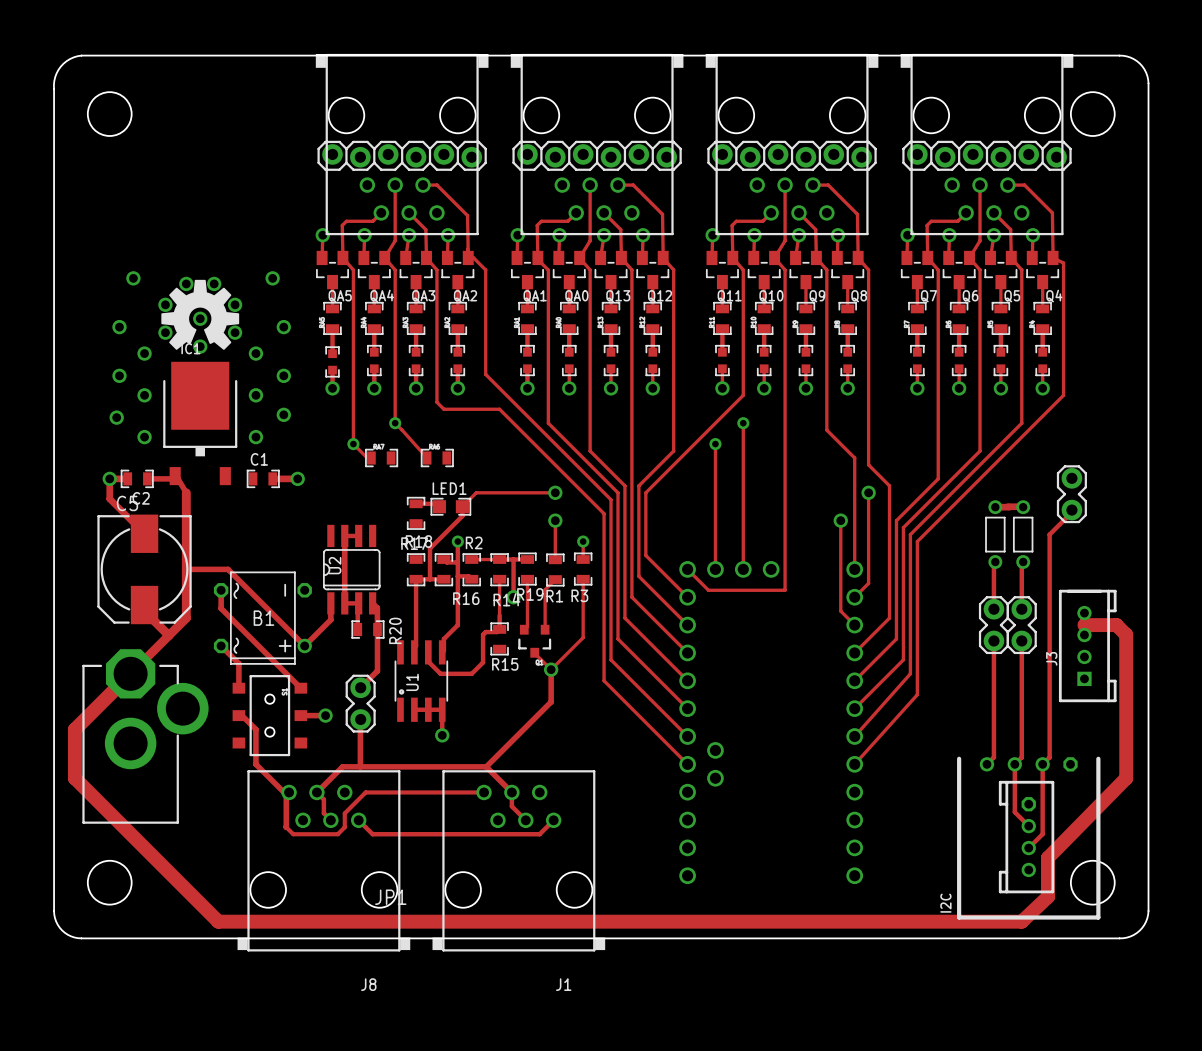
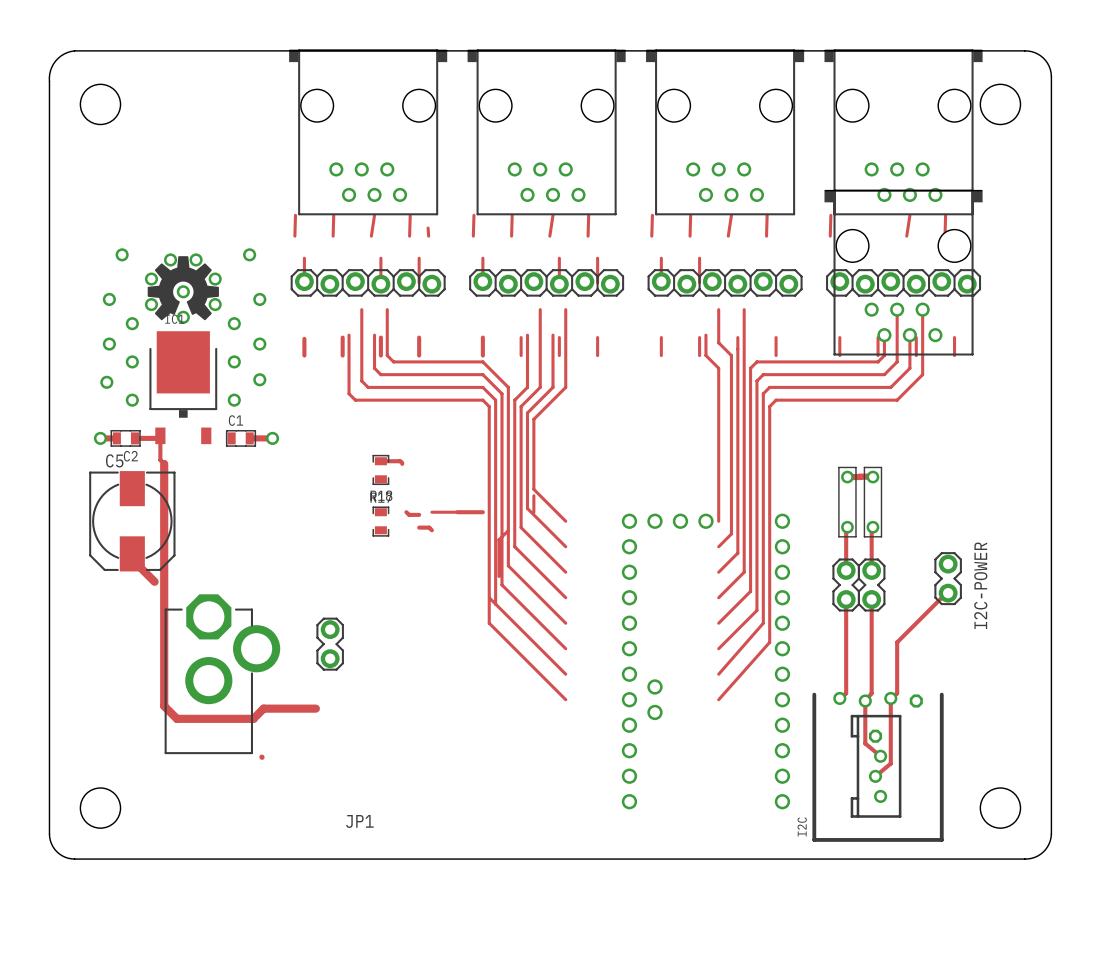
part: (402, 155) -> none
part: (597, 155) -> none
part: (792, 155) -> none
part: (986, 155) -> none
track: (395, 185) (395, 240) (384, 257) (395, 270) (395, 338) -> none
track: (423, 185) (436, 185) (467, 215) (468, 257) (473, 257) (485, 270) (485, 374) (611, 499) (611, 659) (687, 736) -> none
track: (590, 185) (590, 240) (579, 257) (590, 270) (590, 338) -> none
track: (617, 185) (633, 185) (662, 214) (663, 257) (673, 270) (673, 451) (638, 485) (638, 576) (687, 625) -> none
track: (785, 185) (785, 240) (774, 257) (785, 270) (785, 338) -> none
track: (812, 185) (828, 185) (857, 214) (858, 257) (868, 270) (868, 464) (889, 485) (889, 618) (854, 652) -> none
track: (980, 185) (980, 240) (969, 257) (980, 270) (980, 338) -> none
track: (1007, 185) (1024, 185) (1052, 212) (1053, 257) (1063, 263) (1063, 395) (917, 541) (917, 694) (854, 764) -> none
track: (381, 212) (372, 221) (346, 221) (342, 225) (342, 257) (353, 270) (353, 444) (367, 458) (371, 458) -> none
track: (409, 212) (425, 229) (426, 257) (436, 270) (436, 402) (443, 409) -> (374, 335) (374, 368) (380, 374) (406, 374)
track: (576, 212) (567, 221) (541, 221) (537, 225) (537, 257) (548, 270) (548, 423) (617, 492) (617, 639) (687, 708) -> none
track: (604, 212) (620, 229) (621, 257) (631, 270) (631, 597) (687, 652) -> none
track: (771, 212) (762, 221) (736, 221) (732, 225) (732, 257) (743, 270) (743, 395) (645, 492) (645, 555) (687, 597) -> none
track: (799, 212) (815, 229) (816, 257) (826, 270) (826, 416) -> (897, 361) (884, 374) (763, 374) (756, 381)
track: (966, 212) (957, 221) (931, 221) (927, 225) (927, 257) (938, 270) (938, 478) (896, 520) (896, 639) (854, 680) -> none
track: (993, 212) (1010, 229) (1011, 257) (1021, 270) (1021, 423) (910, 534) (910, 673) (854, 736) -> none
via: (322, 235) -> none
via: (364, 235) -> none
via: (409, 235) -> none
via: (448, 235) -> none
via: (517, 235) -> none
via: (559, 235) -> none
via: (604, 235) -> none
via: (643, 235) -> none
via: (712, 235) -> none
via: (754, 235) -> none
via: (799, 235) -> none
via: (837, 235) -> none
via: (907, 235) -> none
track: (949, 235) (948, 257) -> none
via: (949, 235) -> none
via: (993, 235) -> none
via: (1032, 235) -> none
QA5: (332, 270) -> none
QA4: (374, 270) -> none
QA3: (416, 270) -> none
QA2: (457, 270) -> none
QA1: (527, 270) -> none
QA0: (569, 270) -> none
Q13: (611, 270) -> none
Q12: (652, 270) -> none
Q11: (722, 270) -> none
Q10: (764, 270) -> none
Q9: (805, 270) -> none
Q8: (847, 270) -> none
Q7: (917, 270) -> none
Q6: (959, 270) -> none
Q5: (1000, 270) -> none
Q4: (1042, 270) -> none
track: (374, 282) (374, 308) -> none
track: (569, 282) (569, 308) -> none
track: (805, 282) (805, 308) -> none
track: (847, 282) (847, 308) -> none
track: (917, 282) (917, 308) -> none
track: (959, 282) (959, 308) -> none
track: (1000, 282) (1000, 308) -> none
track: (1042, 282) (1042, 308) -> none
part: none -> (903, 272)
part: none -> (368, 282)
part: none -> (546, 282)
part: none -> (725, 282)
part: none -> (903, 282)
part: (332, 318) -> none
part: (374, 318) -> none
part: (416, 318) -> none
part: (457, 318) -> none
part: (527, 318) -> none
part: (569, 318) -> none
part: (611, 318) -> none
part: (652, 318) -> none
part: (722, 318) -> none
part: (764, 318) -> none
part: (805, 318) -> none
part: (847, 318) -> none
part: (917, 318) -> none
part: (959, 318) -> none
part: (1000, 318) -> none
part: (1042, 318) -> none
track: (332, 328) (332, 353) -> none
track: (374, 328) (374, 352) -> none
track: (416, 328) (416, 352) -> none
track: (457, 328) (457, 352) -> none
track: (527, 328) (527, 352) -> none
track: (569, 328) (569, 352) -> none
track: (611, 328) (611, 352) -> none
track: (652, 328) (652, 352) -> none
track: (722, 328) (722, 352) -> none
track: (764, 328) (764, 352) -> none
track: (805, 328) (805, 352) -> none
track: (847, 328) (847, 352) -> none
track: (917, 328) (917, 352) -> none
track: (959, 328) (959, 352) -> none
track: (1000, 328) (1000, 352) -> none
track: (1042, 328) (1042, 352) -> none
track: none -> (387, 309) (387, 355) (393, 361) (482, 361) (508, 387) (508, 476)
track: none -> (565, 309) (565, 387) (533, 419) (533, 489) (565, 521)
track: none -> (744, 309) (744, 572) (718, 597)
track: none -> (922, 309) (922, 374) (897, 400) (776, 400) (769, 406) (769, 476)
part: (374, 360) -> none
part: (416, 360) -> none
part: (457, 360) -> none
part: (527, 360) -> none
part: (569, 360) -> none
part: (611, 360) -> none
part: (652, 360) -> none
part: (722, 360) -> none
part: (764, 360) -> none
part: (805, 360) -> none
part: (847, 360) -> none
part: (917, 360) -> none
part: (959, 360) -> none
part: (1000, 360) -> none
part: (1042, 360) -> none
part: (332, 361) -> none
track: none -> (527, 335) (527, 387) (514, 400) (514, 546) (565, 597)
track: none -> (552, 335) (552, 387) (527, 412) (527, 508) (565, 546)
track: none -> (884, 335) (884, 355) (878, 361) (756, 361) (750, 368) (750, 591) (718, 623)
track: none -> (909, 335) (909, 368) (890, 387) (769, 387) (763, 393) (763, 623) (718, 674)
track: (785, 374) (785, 402) -> (705, 335) (705, 355) (718, 368)
track: none -> (718, 342) (731, 355) (731, 534) (718, 546)
via: (332, 388) -> none
via: (374, 388) -> none
via: (416, 388) -> none
via: (457, 388) -> none
via: (527, 388) -> none
via: (569, 388) -> none
via: (611, 388) -> none
via: (652, 388) -> none
via: (722, 388) -> none
via: (764, 388) -> none
track: none -> (737, 355) (737, 553) (718, 572)
via: (805, 388) -> none
via: (847, 388) -> none
via: (917, 388) -> none
via: (959, 388) -> none
via: (1000, 388) -> none
via: (1042, 388) -> none
track: (980, 395) (980, 451) (903, 527) (903, 659) (854, 708) -> none
track: (499, 409) (527, 437) -> (349, 335) (349, 393) (355, 400) (482, 400)
track: none -> (457, 374) (482, 374) (502, 393) (502, 584) (565, 648)
track: (395, 416) (395, 423) (427, 458) -> (361, 381) (368, 387) (482, 387) (495, 400) (495, 604)
via: (395, 423) -> none
track: (590, 423) (590, 451) (624, 485) (624, 618) (687, 680) -> (540, 387) (521, 406) (521, 527) (565, 572)
track: (743, 423) (743, 569) -> none
via: (743, 423) -> none
track: (826, 430) (854, 458) (854, 569) -> (756, 393) (756, 610) (718, 648)
via: (353, 444) -> none
track: (534, 444) (604, 513) (604, 680) (687, 764) -> (489, 406) (489, 623) (565, 699)
track: (715, 444) (715, 569) -> none
via: (715, 444) -> none
part: (381, 458) -> none
part: (437, 458) -> none
C2 footprint: [120, 469, 154, 489] -> [110, 429, 141, 447]
C1 footprint: [246, 469, 280, 489] -> [225, 429, 257, 447]
track: (175, 476) (186, 492) (186, 618) (74, 729) (74, 778) (218, 921) (1021, 921) (1047, 896) (1047, 857) (1126, 778) (1126, 634) (1116, 625) (1084, 625) -> (160, 435) (160, 460) (164, 463) (164, 706) (176, 718) (253, 718) (263, 708) (315, 708)
track: (109, 478) (109, 498) (144, 533) -> none
track: (555, 492) (476, 492) (462, 506) (462, 516) (430, 548) (430, 579) -> none
via: (555, 492) -> none
track: (868, 492) (868, 583) (854, 597) -> none
via: (868, 492) -> none
part: (1071, 494) -> none
LED1: (450, 506) -> none
track: (1007, 506) (1023, 506) (995, 507) -> (858, 476) (873, 476) (847, 477)
track: (1071, 510) (1049, 534) (1049, 757) (1042, 764) (1042, 834) (1028, 848) -> none
via: (555, 520) -> none
via: (840, 520) -> none
part: (995, 534) -> none
part: (1023, 534) -> none
track: (358, 535) (344, 535) (344, 603) (358, 603) (357, 629) -> none
track: (457, 541) (457, 625) (443, 639) (442, 652) -> none
via: (457, 541) -> none
via: (583, 541) -> none
part: none -> (847, 502)
part: none -> (872, 502)
track: (513, 559) (513, 597) -> none
track: none -> (508, 512) (508, 565) (565, 623)
track: (995, 561) (993, 609) -> (847, 527) (846, 570)
track: (1023, 561) (1021, 609) -> (872, 527) (871, 570)
track: (186, 569) (228, 569) (304, 645) (330, 619) (330, 603) -> none
U2: (351, 569) -> none
R16: (443, 569) -> none
R2: (471, 569) -> none
R14: (499, 569) -> none
R19: (527, 569) -> none
R3: (583, 569) -> none
track: (687, 569) (708, 590) (785, 590) (785, 569) -> none
R1: (555, 570) -> none
track: (443, 579) (416, 579) (416, 645) (414, 653) -> none
track: (499, 579) (499, 629) (497, 632) (485, 632) (483, 634) (483, 662) (471, 673) (440, 673) (428, 661) (428, 652) -> none
track: (527, 579) (527, 626) (524, 629) -> none
track: (583, 579) (583, 637) (551, 669) (551, 701) (486, 766) -> none
track: (221, 590) (221, 608) (300, 688) -> none
via: (513, 597) -> none
track: (372, 603) (377, 608) (377, 670) (360, 687) -> none
track: (840, 611) (854, 625) -> (769, 559) (769, 642) (718, 699)
B1: (262, 618) -> none
part: (993, 625) -> none
part: (1021, 625) -> none
R20: (367, 629) -> none
I2C-POWER: none -> (948, 578)
R15: (499, 638) -> none
part: none -> (846, 584)
part: none -> (871, 584)
track: (993, 640) (993, 757) (986, 764) -> none
track: (1021, 640) (1021, 757) (1014, 764) (1014, 812) (1028, 826) -> none
part: (534, 641) -> none
track: (221, 645) (238, 663) (238, 688) -> none
J3: (1087, 645) -> none
track: none -> (948, 593) (897, 642) (897, 693) (890, 698) (890, 763) (875, 776)
track: none -> (846, 599) (846, 693) (839, 698)
track: none -> (871, 599) (871, 693) (865, 700) (865, 743) (880, 756)
track: none -> (504, 613) (565, 674)
via: (551, 669) -> none
U1: (421, 681) -> none
track: (414, 709) (442, 709) (442, 735) -> none
track: (238, 715) (242, 715) (255, 729) (255, 764) (284, 792) (289, 792) (286, 795) (286, 827) (293, 834) (337, 834) (344, 827) (344, 813) (365, 792) (484, 792) -> none
part: (269, 715) -> none
track: (300, 715) (325, 715) -> none
via: (325, 715) -> none
track: (360, 719) (360, 766) -> none
via: (442, 735) -> none
part position: (145, 736) -> (222, 674)
I2C footprint: [957, 756, 1101, 920] -> [812, 691, 944, 842]
track: (486, 766) (342, 766) (316, 792) (323, 799) (323, 813) (330, 820) -> none
track: (486, 766) (511, 792) (511, 806) (525, 820) -> none
track: (358, 820) (372, 834) (539, 834) (553, 820) -> none
J8: (323, 860) -> none
J1: (518, 860) -> none

